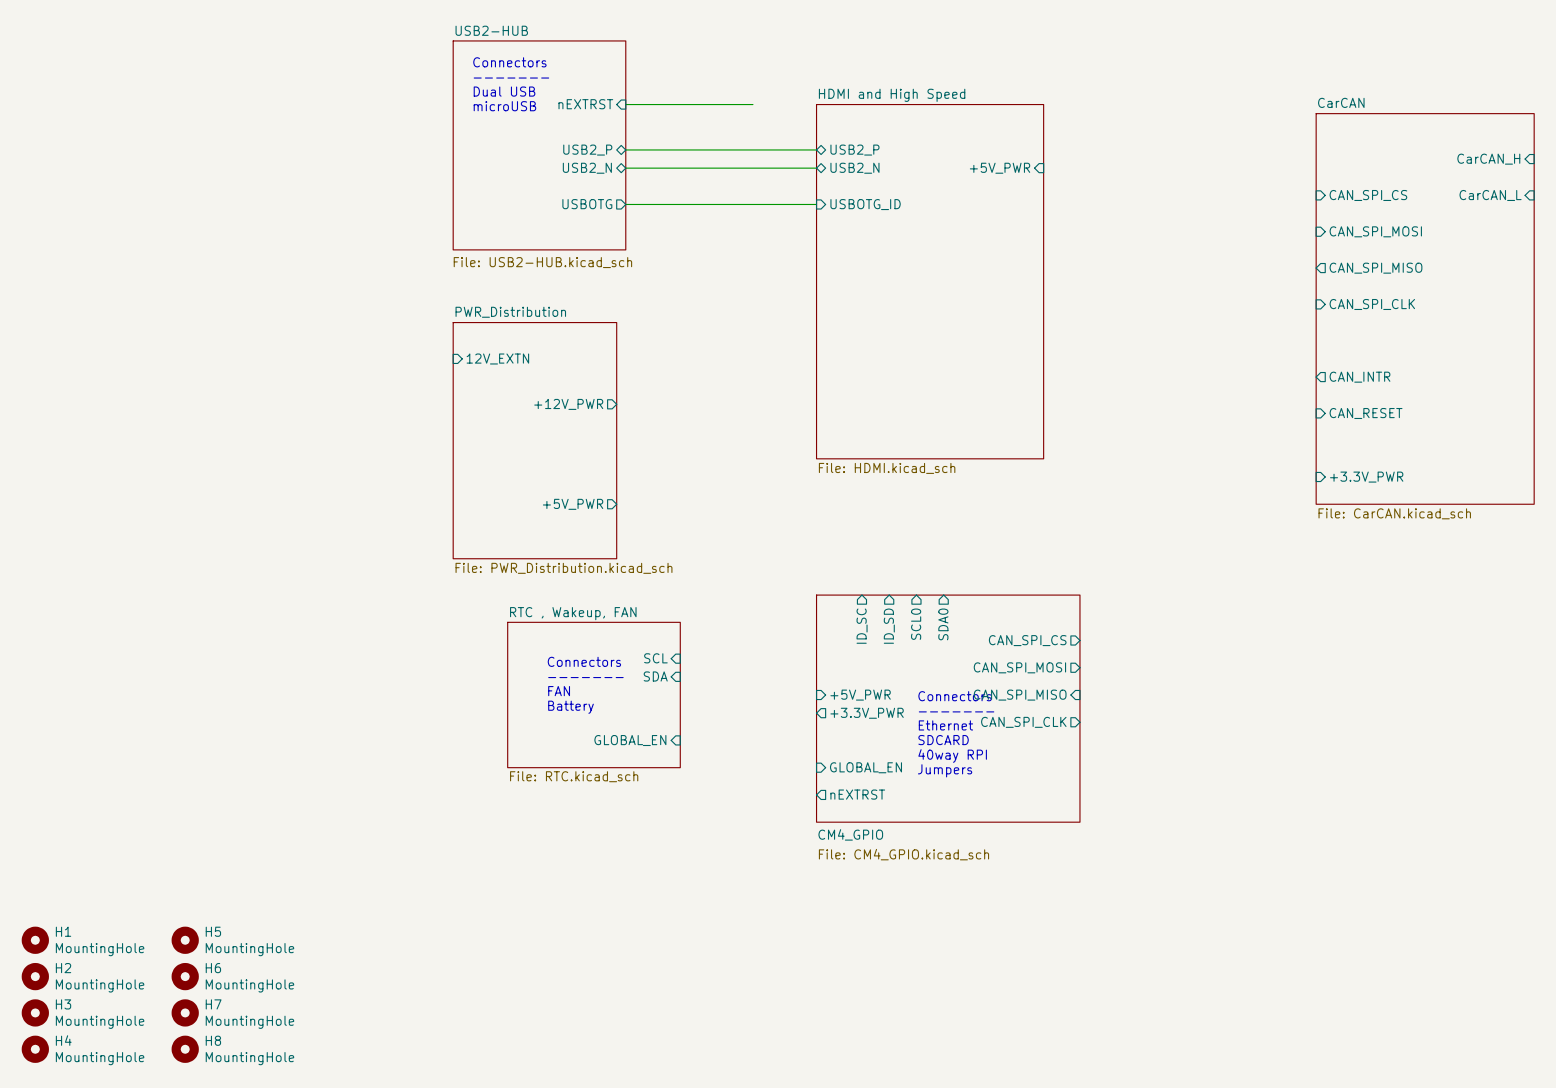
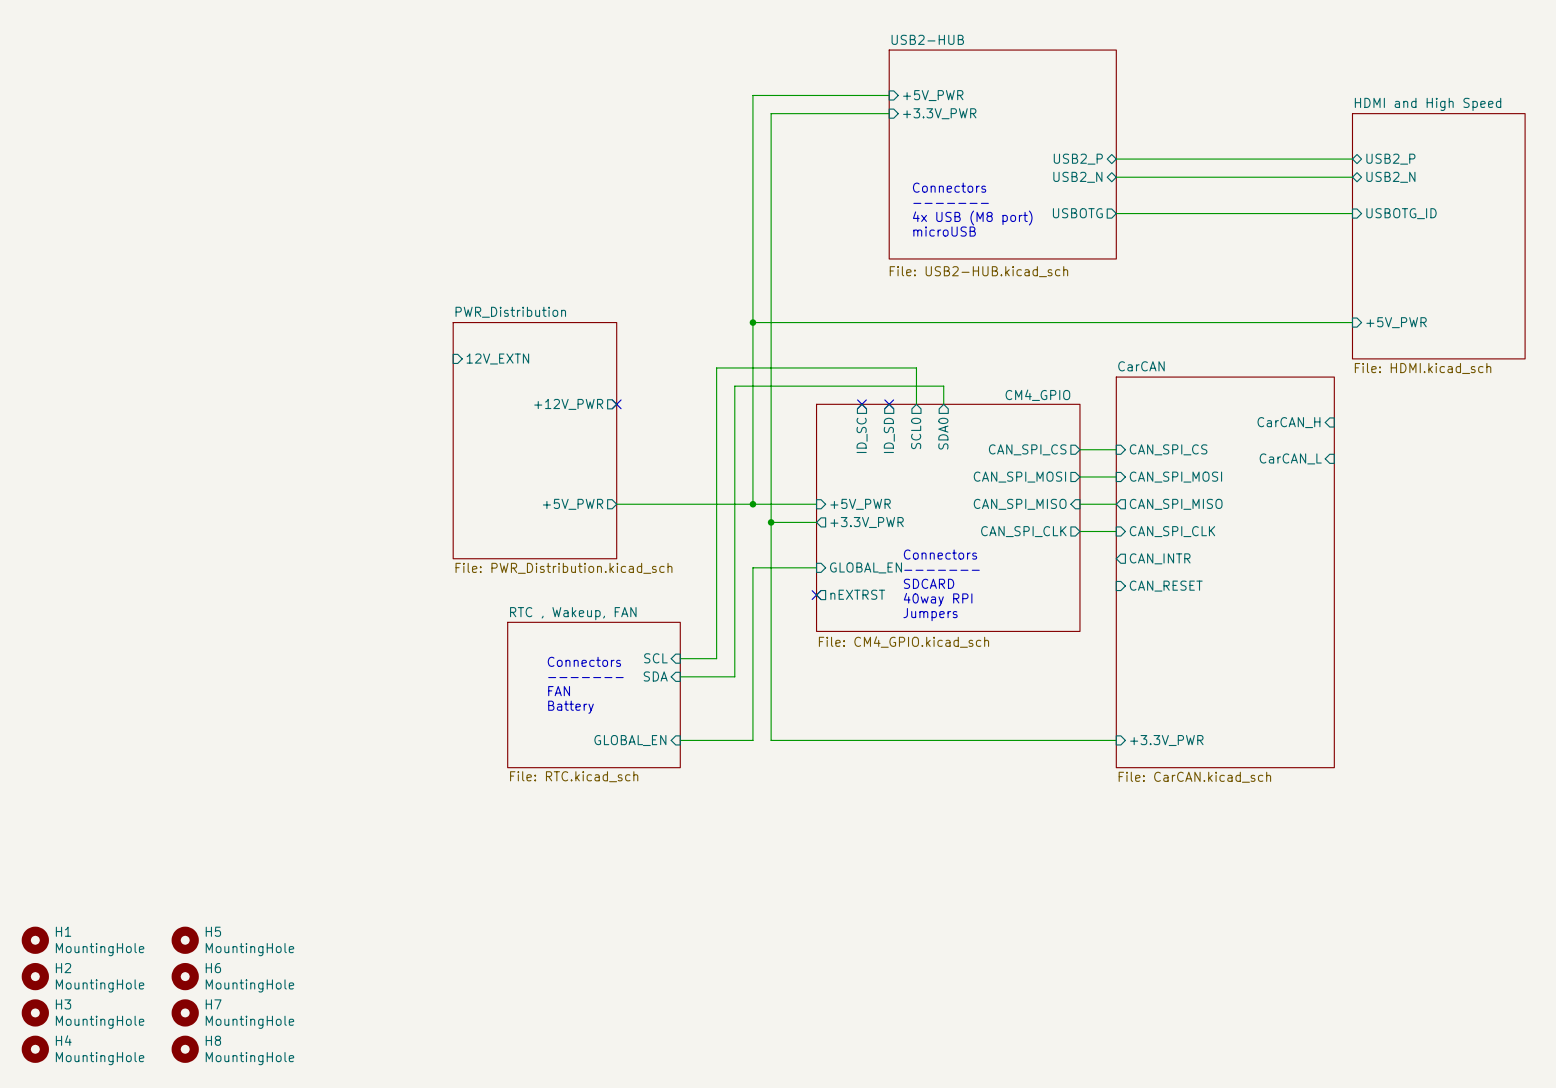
sheet USB2-HUB name position: USB2-HUB (491, 30) -> USB2-HUB (927, 39)
sheet USB2-HUB shape: [452, 40, 627, 251] -> [888, 49, 1117, 260]
text: Connectors (509, 62) -> none
text: ------- (511, 78) -> none
text: Dual USB (504, 91) -> none
wire: none -> (889, 95) (752, 95) (752, 504)
sheet pin: nEXTRST (585, 104) -> none
wire: (625, 104) (752, 104) -> none
text: microUSB (504, 106) -> none
wire: none -> (889, 113) (771, 113) (771, 740) (1116, 740)
sheet pin: none -> +3.3V_PWR (939, 113)
wire: (625, 149) (816, 149) -> none
sheet pin: USB2_P (587, 150) -> none
sheet pin: USB2_P (854, 150) -> none
sheet pin: none -> USB2_P (1078, 159)
wire: none -> (1116, 159) (1352, 159)
sheet pin: none -> USB2_P (1390, 159)
sheet pin: CarCAN_H (1488, 159) -> none
sheet pin: USB2_N (587, 168) -> none
wire: (625, 168) (816, 168) -> none
sheet pin: USB2_N (854, 168) -> none
sheet pin rotation: 0° (1000, 168) -> 180° (933, 95)
sheet pin position: +5V_PWR (1000, 168) -> +5V_PWR (933, 95)
sheet pin: none -> USB2_N (1077, 177)
wire: none -> (1116, 177) (1352, 177)
sheet pin: none -> USB2_N (1390, 177)
text: none -> Connectors (949, 187)
sheet pin: CAN_SPI_CS (1368, 195) -> none
sheet pin: CarCAN_L (1490, 195) -> none
text: none -> ------- (951, 203)
sheet pin: USBOTG (587, 204) -> none
wire: (625, 204) (816, 204) -> none
sheet pin: USBOTG_ID (865, 204) -> none
sheet pin: none -> USBOTG (1077, 213)
wire: none -> (1116, 213) (1352, 213)
sheet pin: none -> USBOTG_ID (1401, 213)
text: none -> 4x USB (M8 port) (972, 218)
text: none -> microUSB (944, 231)
sheet pin: CAN_SPI_MOSI (1375, 231) -> none
sheet HDMI and High Speed: none -> File: HDMI.kicad_sch (1438, 236)
sheet USB2-HUB value position: File: USB2-HUB.kicad_sch (542, 262) -> File: USB2-HUB.kicad_sch (978, 271)
sheet pin: CAN_SPI_MISO (1375, 268) -> none
sheet HDMI and High Speed: File: HDMI.kicad_sch (930, 281) -> none
sheet pin: CAN_SPI_CLK (1372, 304) -> none
sheet CarCAN: File: CarCAN.kicad_sch (1425, 308) -> none
wire: none -> (752, 322) (1352, 322)
junction: none -> (752, 322)
sheet pin: none -> +5V_PWR (1396, 322)
sheet pin: CAN_INTR (1359, 377) -> none
no-connect mark: none -> (616, 404)
no-connect mark: none -> (861, 404)
no-connect mark: none -> (889, 404)
wire: none -> (916, 404) (916, 367) (716, 367) (716, 658) (680, 658)
wire: none -> (943, 404) (943, 386) (734, 386) (734, 676) (680, 676)
sheet pin: CAN_RESET (1366, 413) -> none
sheet pin: none -> CarCAN_H (1288, 422)
sheet pin: none -> SCL0 (916, 433)
sheet pin: none -> SDA0 (943, 433)
sheet pin: none -> ID_SC (862, 435)
sheet pin: none -> ID_SD (889, 435)
sheet pin: none -> CAN_SPI_CS (1027, 449)
wire: none -> (1079, 449) (1116, 449)
sheet pin: none -> CAN_SPI_CS (1168, 449)
sheet pin: none -> CarCAN_L (1290, 458)
wire: none -> (1079, 476) (1116, 476)
sheet pin: none -> CAN_SPI_MOSI (1019, 477)
sheet pin: none -> CAN_SPI_MOSI (1175, 477)
sheet pin: +3.3V_PWR (1366, 477) -> none
wire: none -> (616, 504) (816, 504)
junction: none -> (752, 504)
sheet pin: none -> +5V_PWR (860, 504)
sheet pin: none -> CAN_SPI_MISO (1020, 504)
wire: none -> (1079, 504) (1116, 504)
sheet pin: none -> CAN_SPI_MISO (1176, 504)
wire: none -> (771, 522) (816, 522)
junction: none -> (771, 522)
sheet pin: none -> +3.3V_PWR (867, 522)
sheet pin: none -> CAN_SPI_CLK (1023, 531)
wire: none -> (1079, 531) (1116, 531)
sheet pin: none -> CAN_SPI_CLK (1172, 531)
sheet pin: none -> CAN_INTR (1160, 558)
wire: none -> (816, 567) (752, 567) (752, 740) (680, 740)
sheet pin: none -> GLOBAL_EN (865, 567)
sheet CarCAN: none -> File: CarCAN.kicad_sch (1225, 572)
sheet pin: none -> CAN_RESET (1166, 586)
sheet pin: none -> nEXTRST (857, 594)
no-connect mark: none -> (816, 595)
sheet pin: SCL0 (916, 624) -> none
sheet pin: SDA0 (943, 624) -> none
sheet pin: ID_SC (862, 626) -> none
sheet pin: ID_SD (889, 626) -> none
sheet pin: CAN_SPI_CS (1027, 640) -> none
sheet pin: CAN_SPI_MOSI (1019, 667) -> none
sheet pin: +5V_PWR (860, 695) -> none
sheet pin: CAN_SPI_MISO (1020, 695) -> none
text position: Connectors (955, 696) -> Connectors (940, 554)
sheet CM4_GPIO position: (948, 708) -> (948, 517)
text position: ------- (956, 711) -> ------- (942, 570)
sheet pin: +3.3V_PWR (867, 713) -> none
sheet pin: CAN_SPI_CLK (1023, 722) -> none
text: Ethernet (945, 725) -> none
text position: SDCARD (943, 740) -> SDCARD (929, 583)
sheet pin: none -> +3.3V_PWR (1166, 740)
text position: 40way RPI (952, 755) -> 40way RPI (938, 599)
sheet pin: GLOBAL_EN (865, 767) -> none
text position: Jumpers (945, 770) -> Jumpers (930, 614)
sheet pin: nEXTRST (857, 794) -> none
sheet CM4_GPIO name position: CM4_GPIO (850, 834) -> CM4_GPIO (1037, 395)
sheet CM4_GPIO value position: File: CM4_GPIO.kicad_sch (903, 854) -> File: CM4_GPIO.kicad_sch (903, 642)

